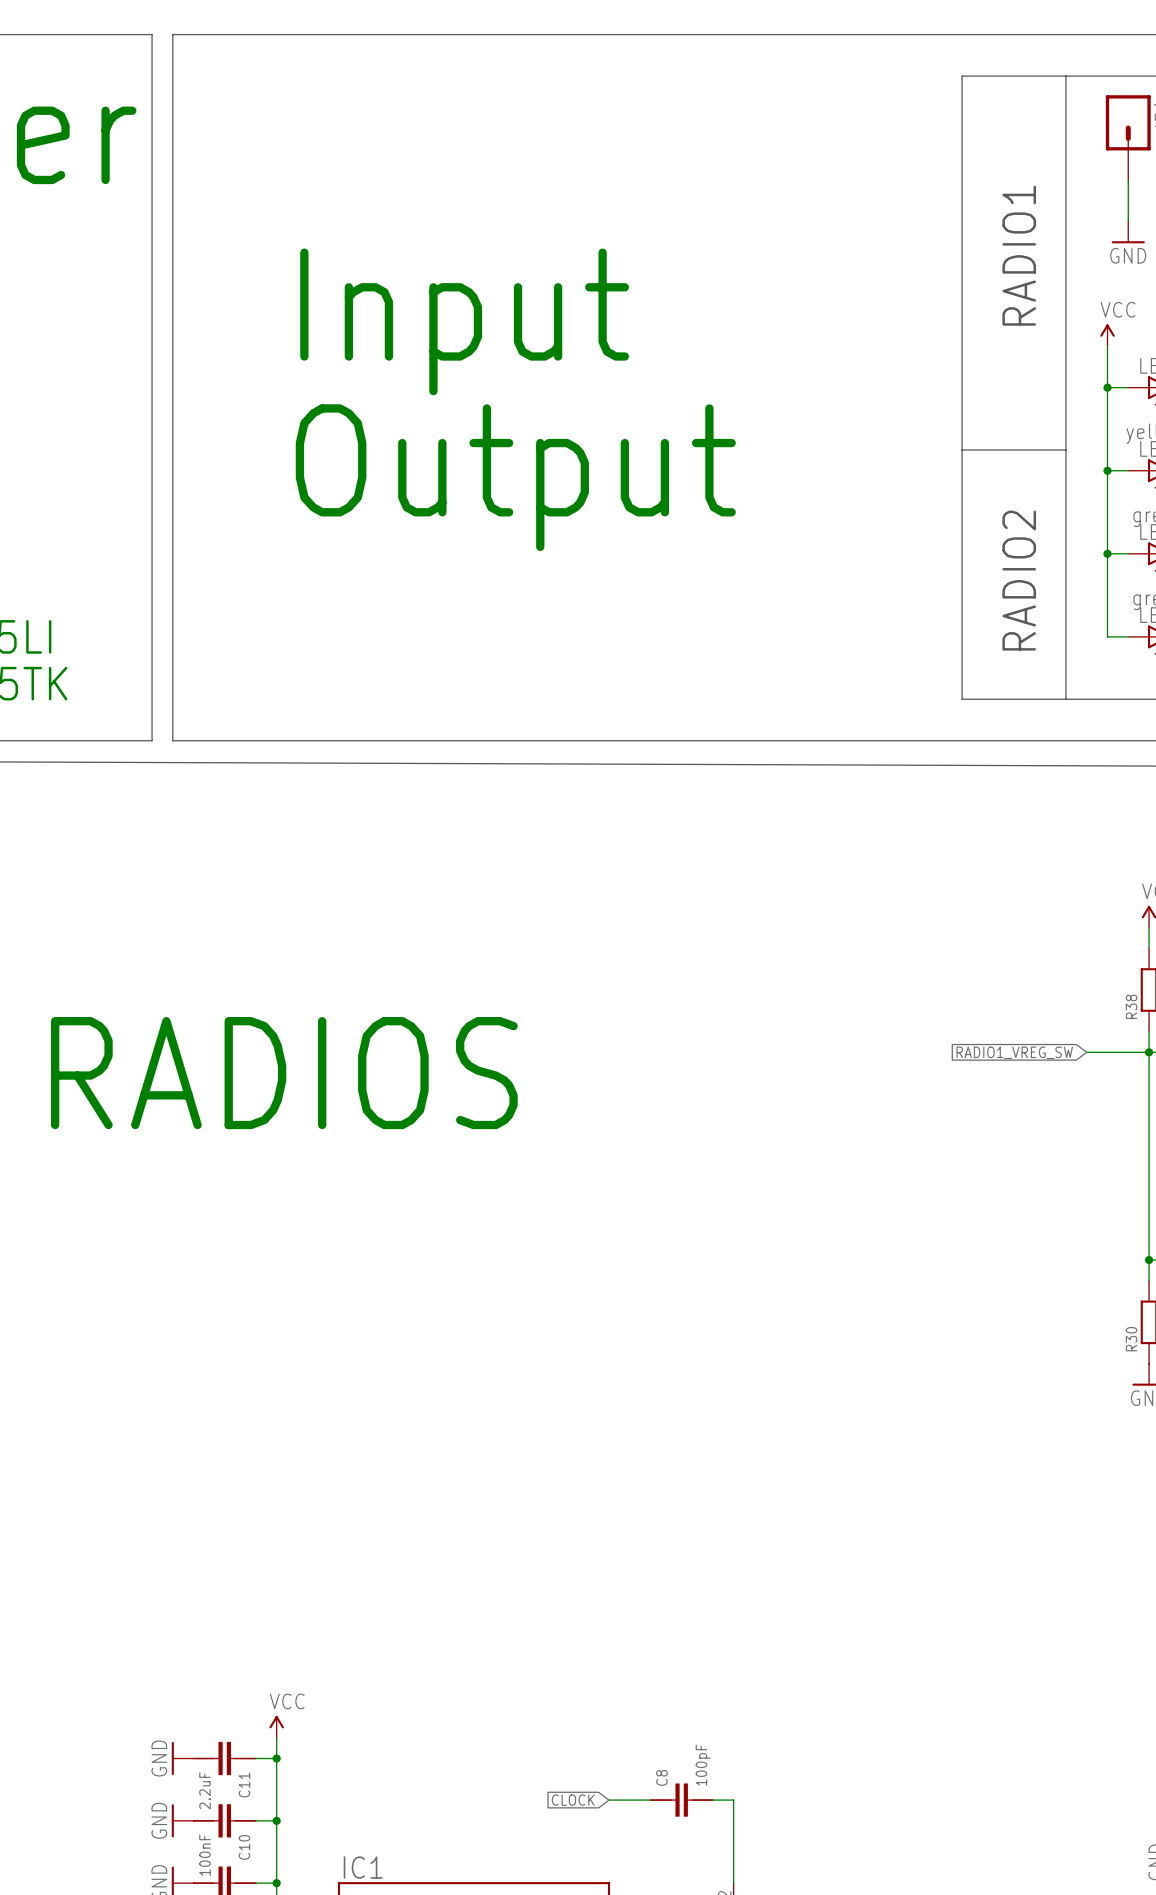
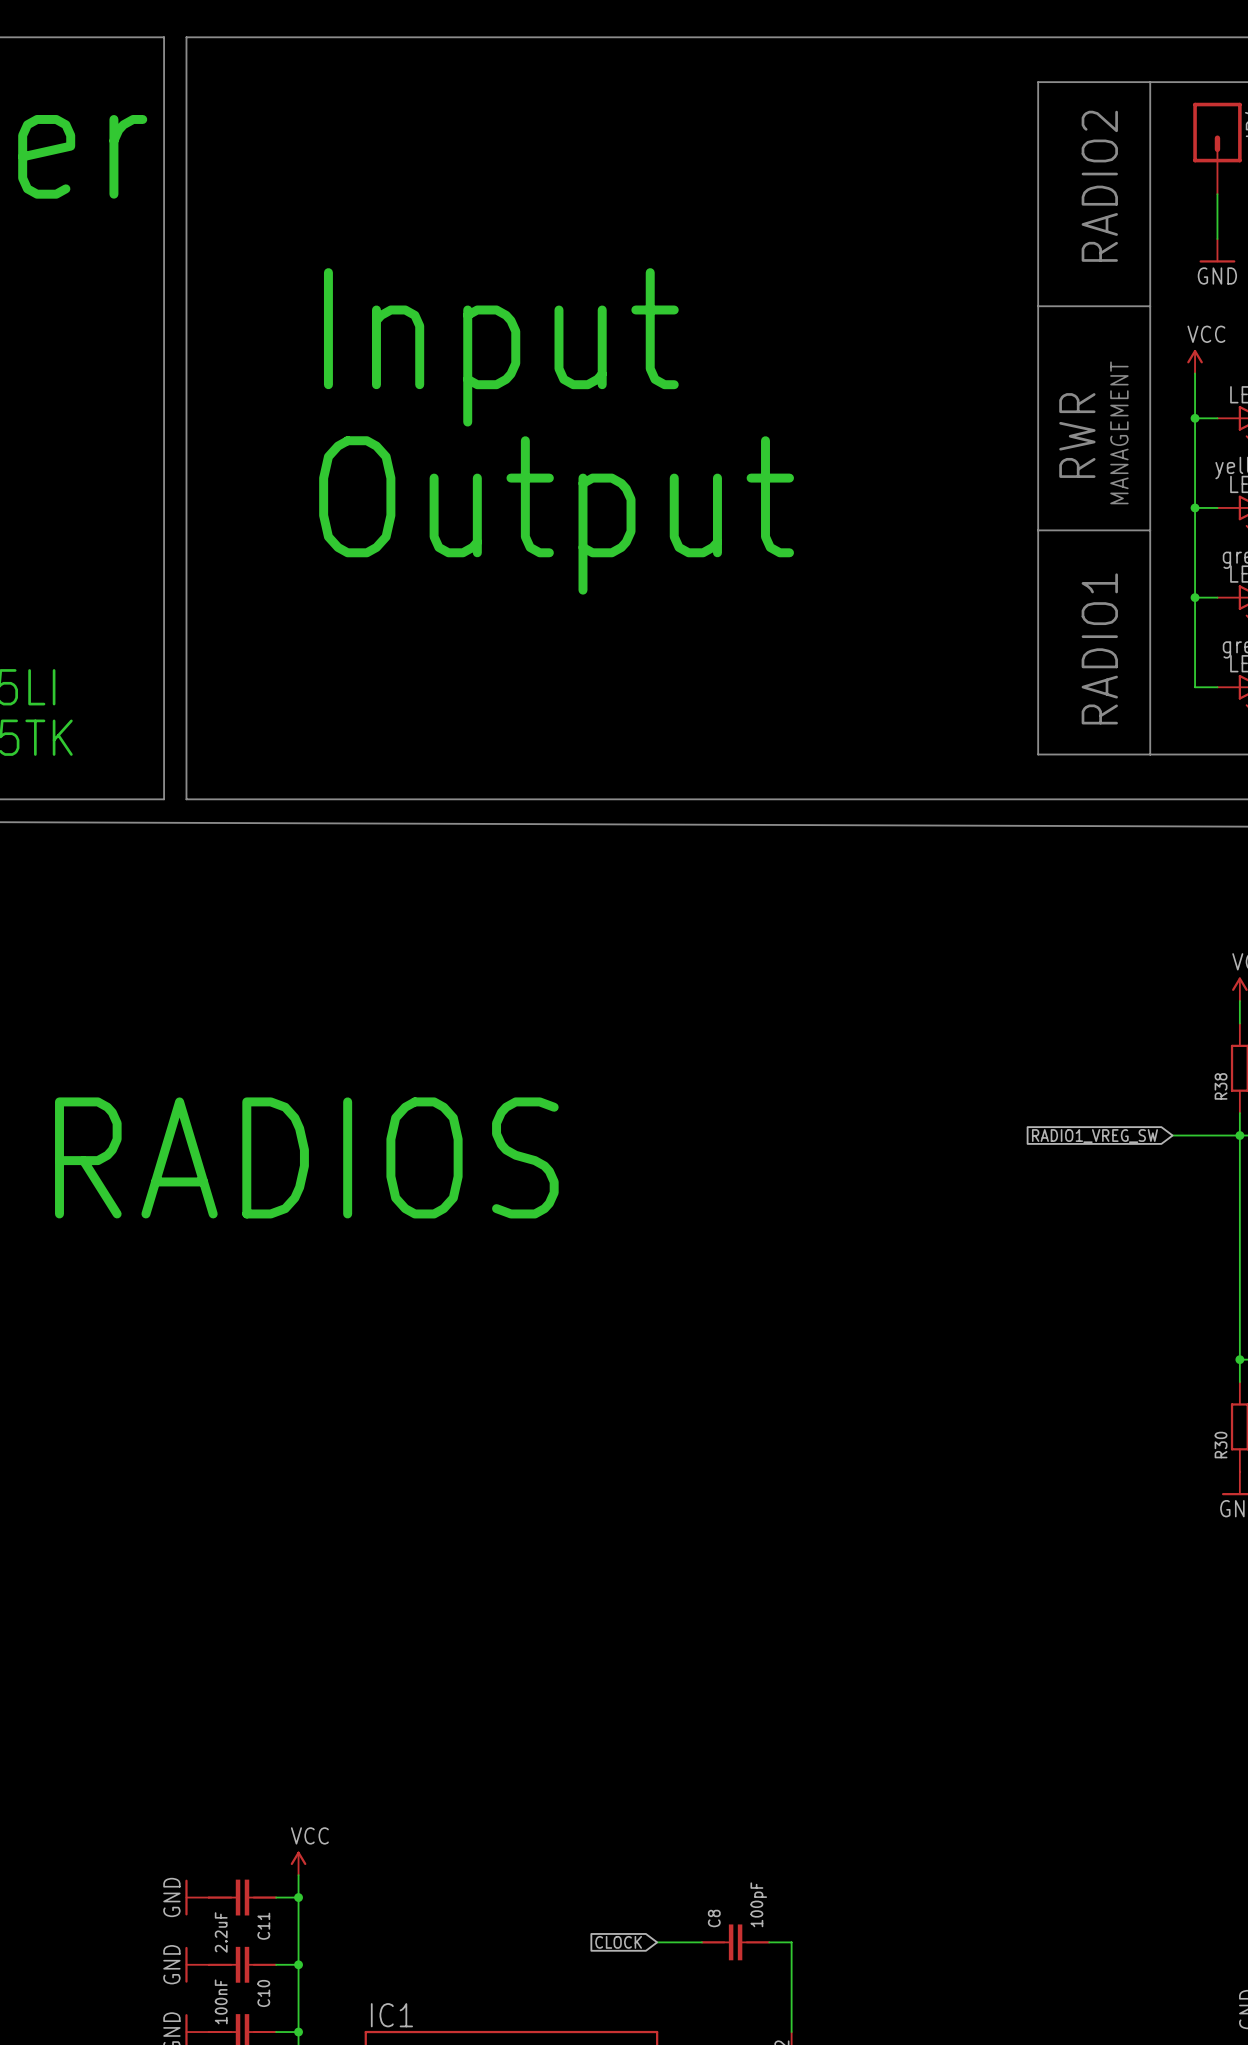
text: RADIO1 (1019, 255) -> RADIO2 (1099, 186)
line: none -> (1038, 306) (1150, 306)
text: none -> MANAGEMENT (1119, 432)
text: none -> RWR (1077, 435)
line: (962, 449) (1065, 449) -> (1038, 530) (1150, 530)
text: RADIO2 (1019, 580) -> RADIO1 (1099, 648)

